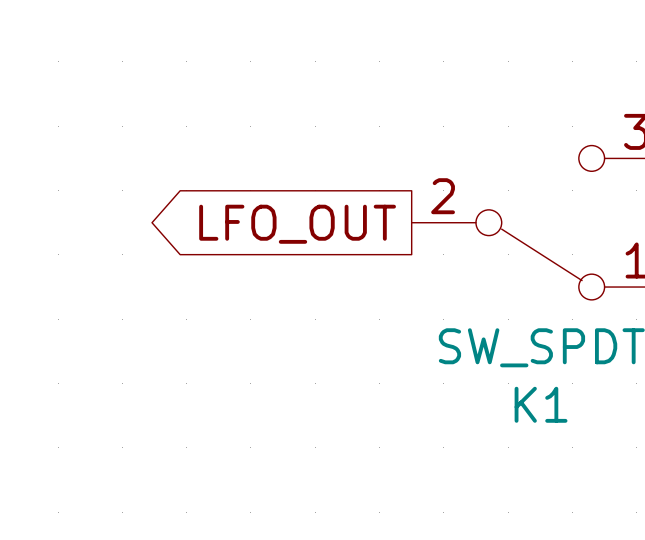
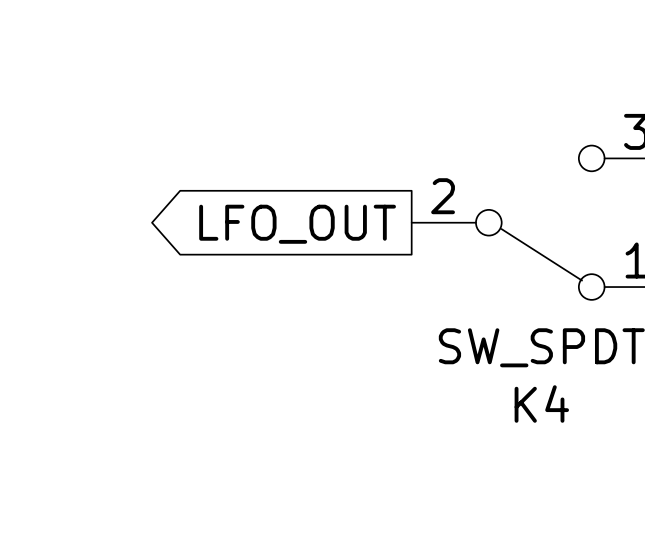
K1 name: K1 (541, 404) -> K4 (541, 404)

